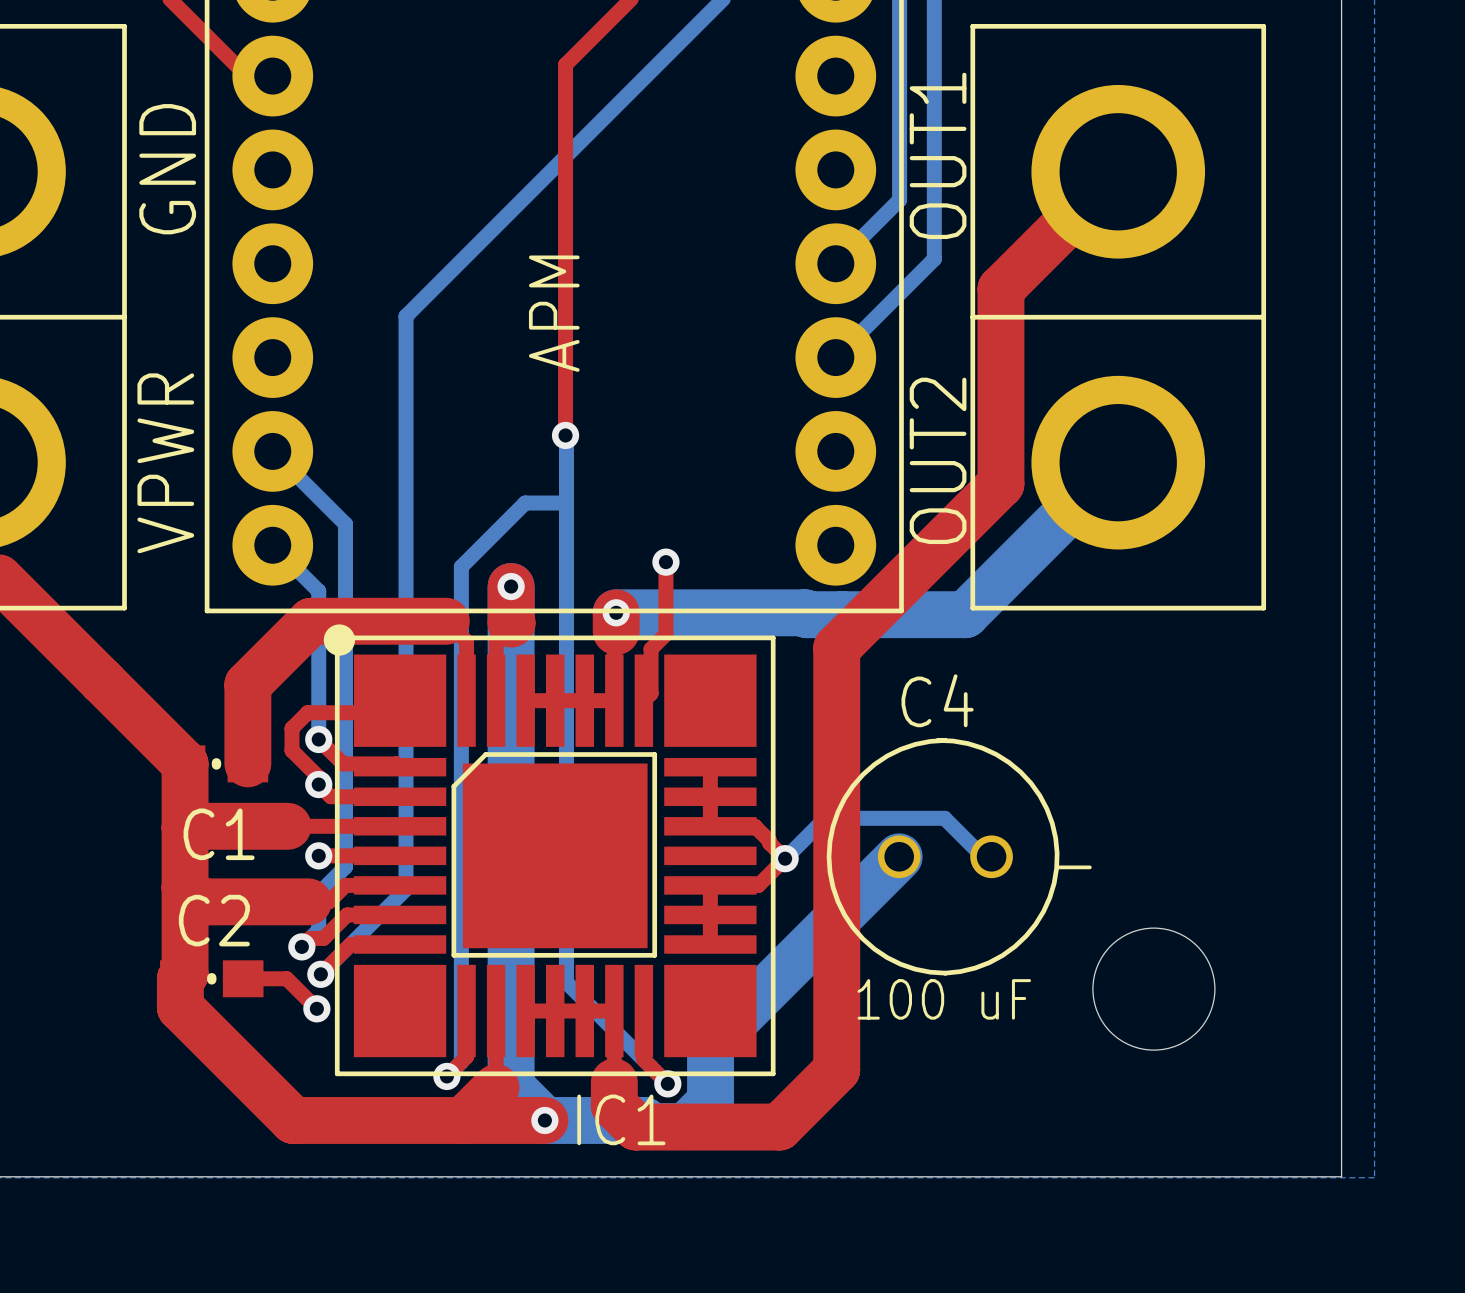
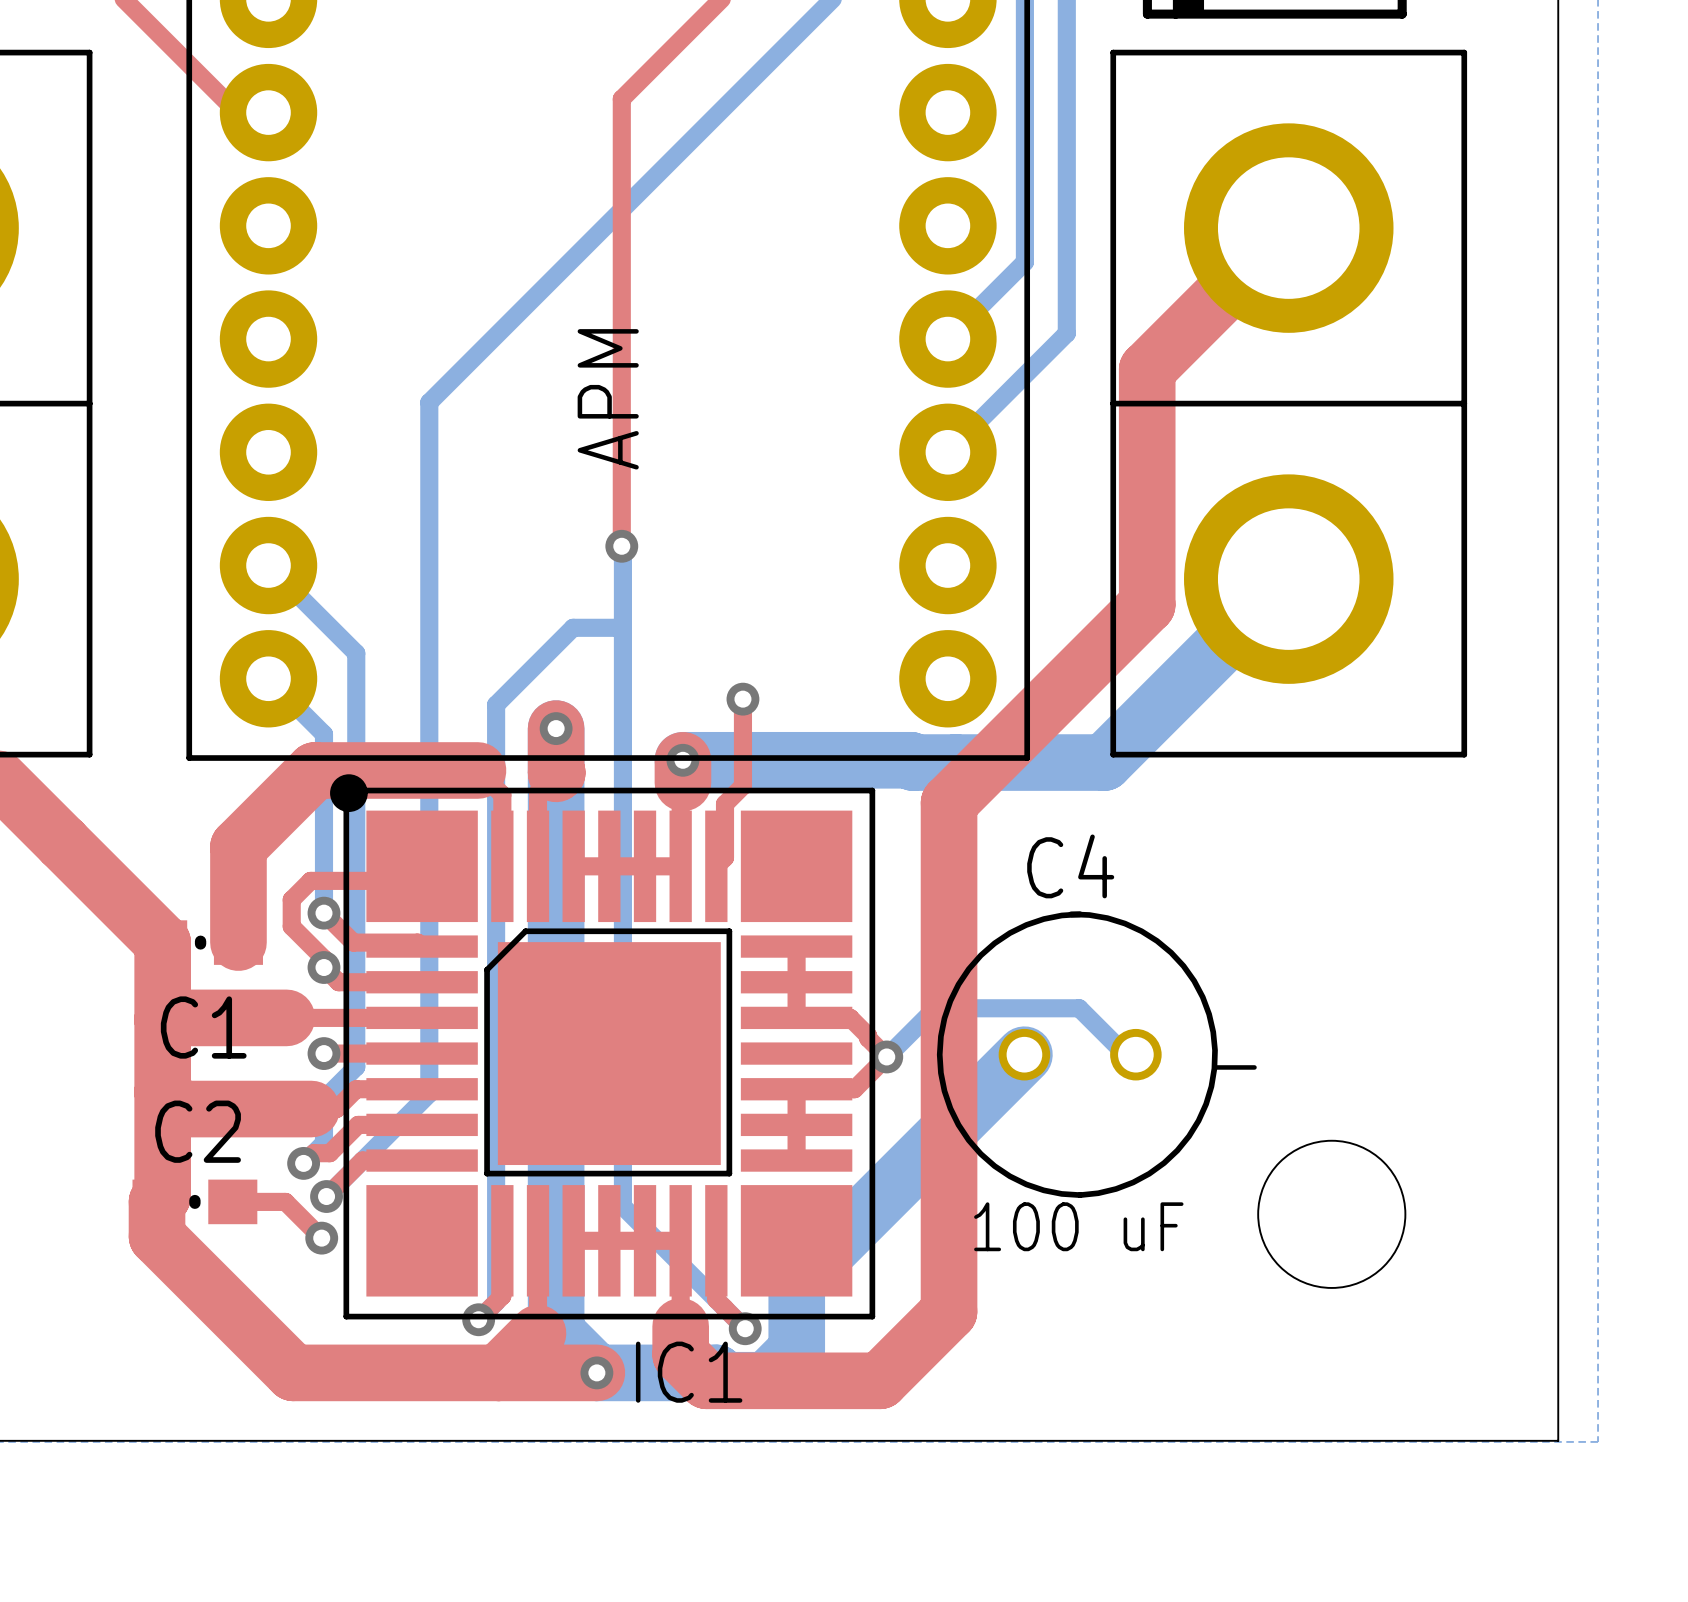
text: OUT1 (938, 155) -> none
text: GND (167, 169) -> none
text: OUT2 (938, 460) -> none
text: VPWR (165, 463) -> none

